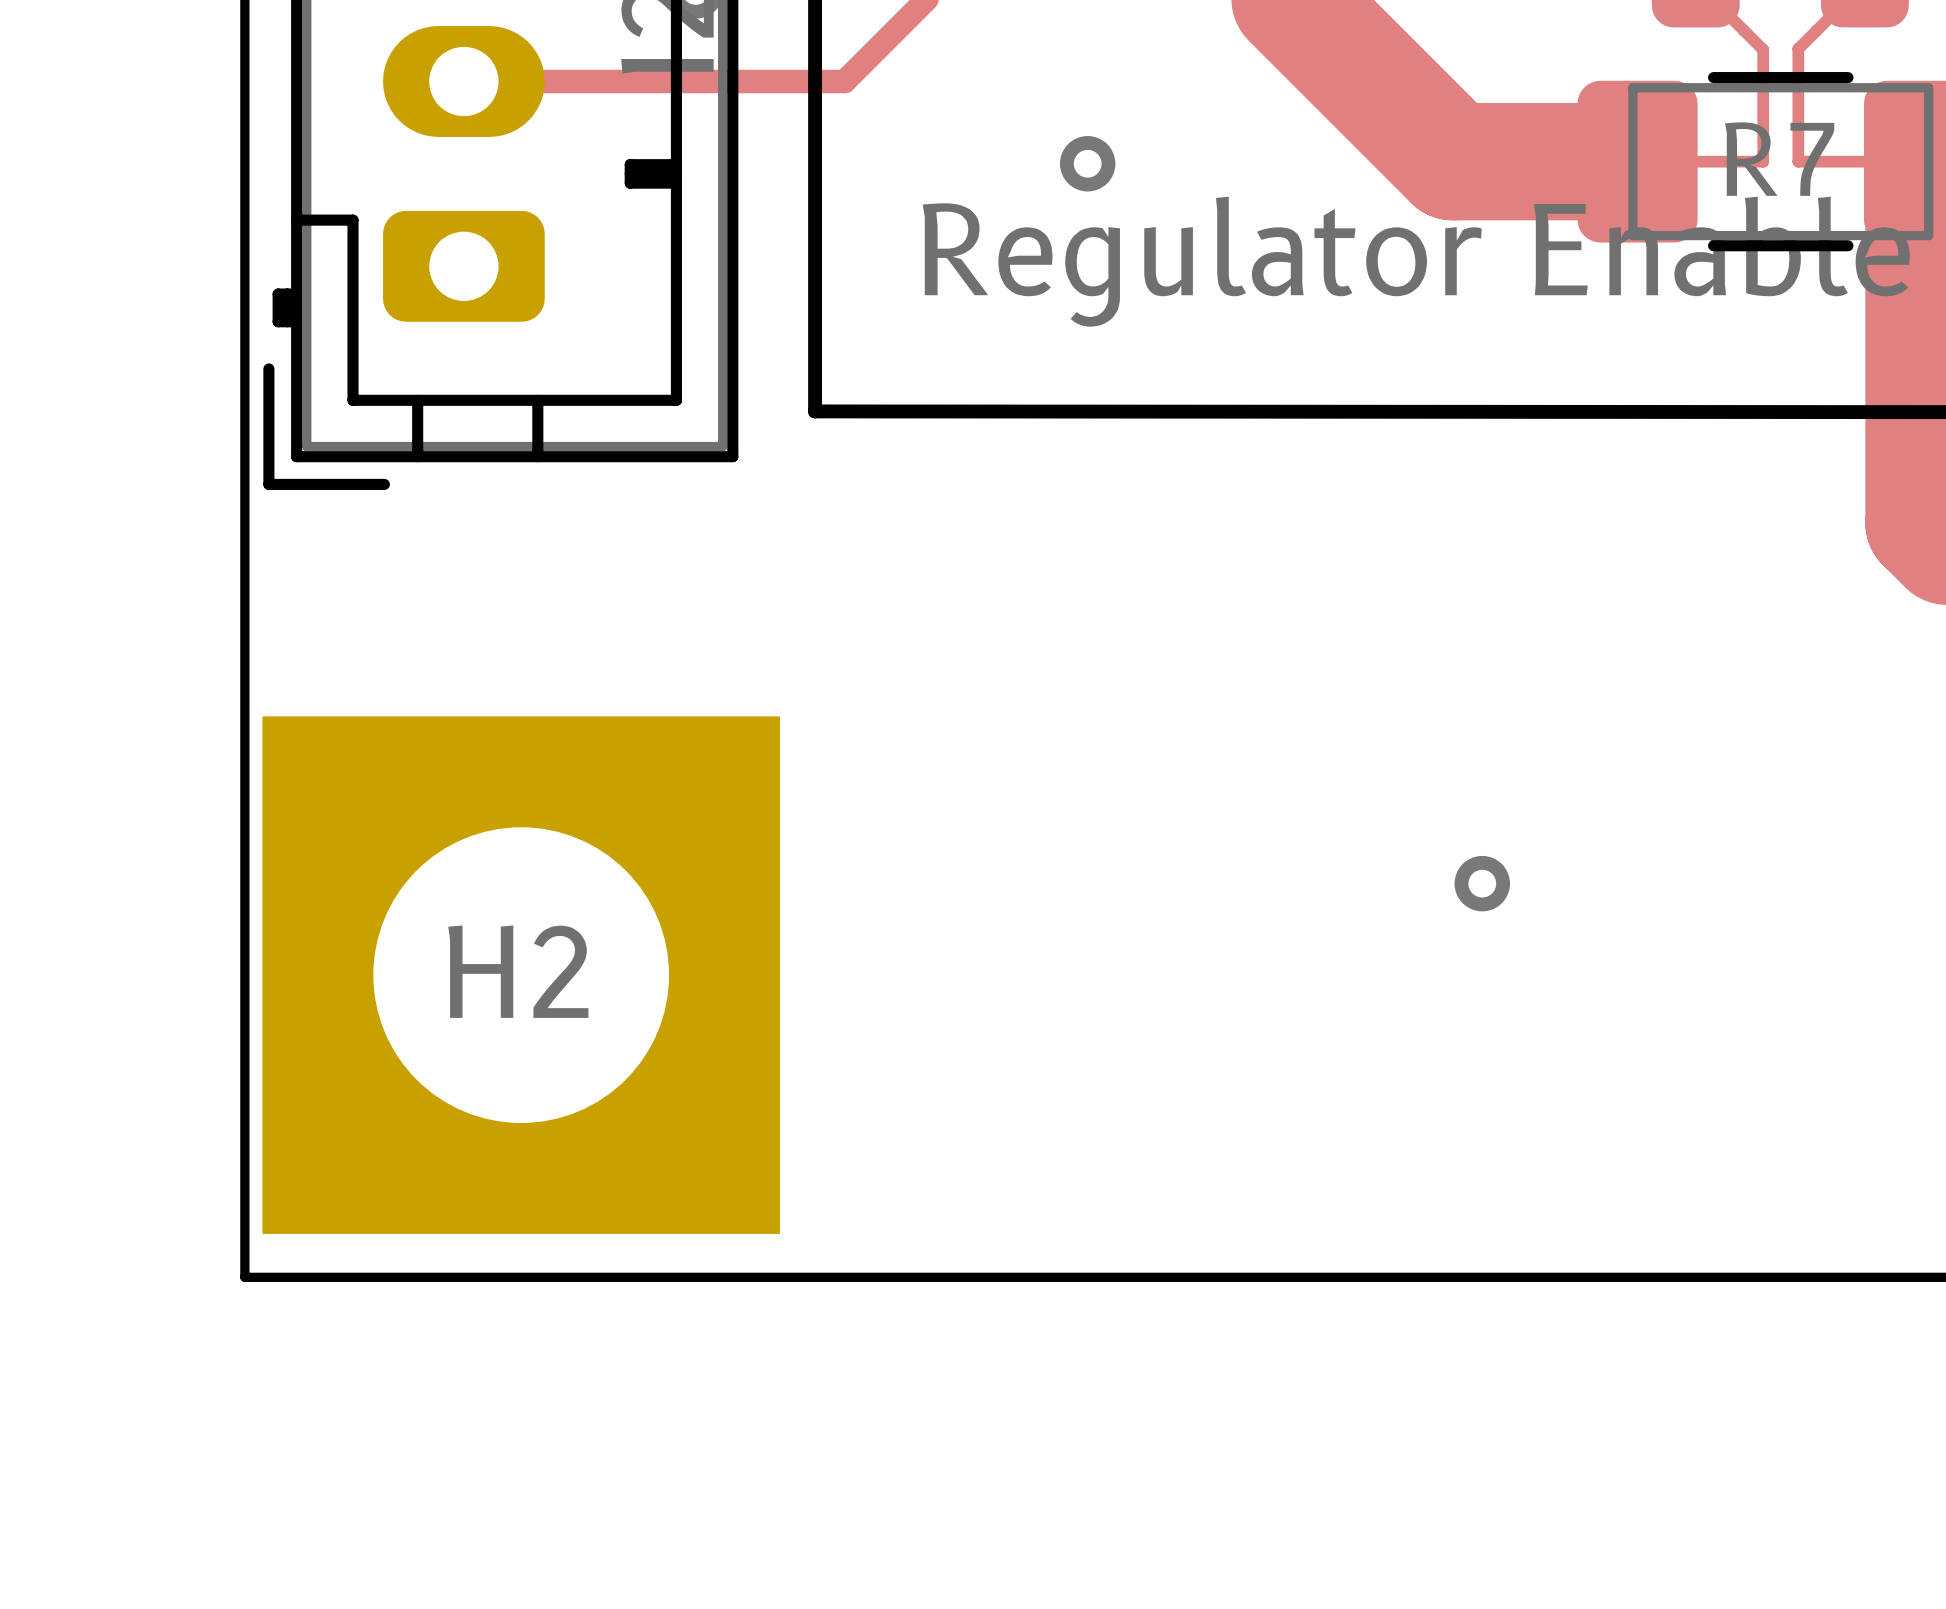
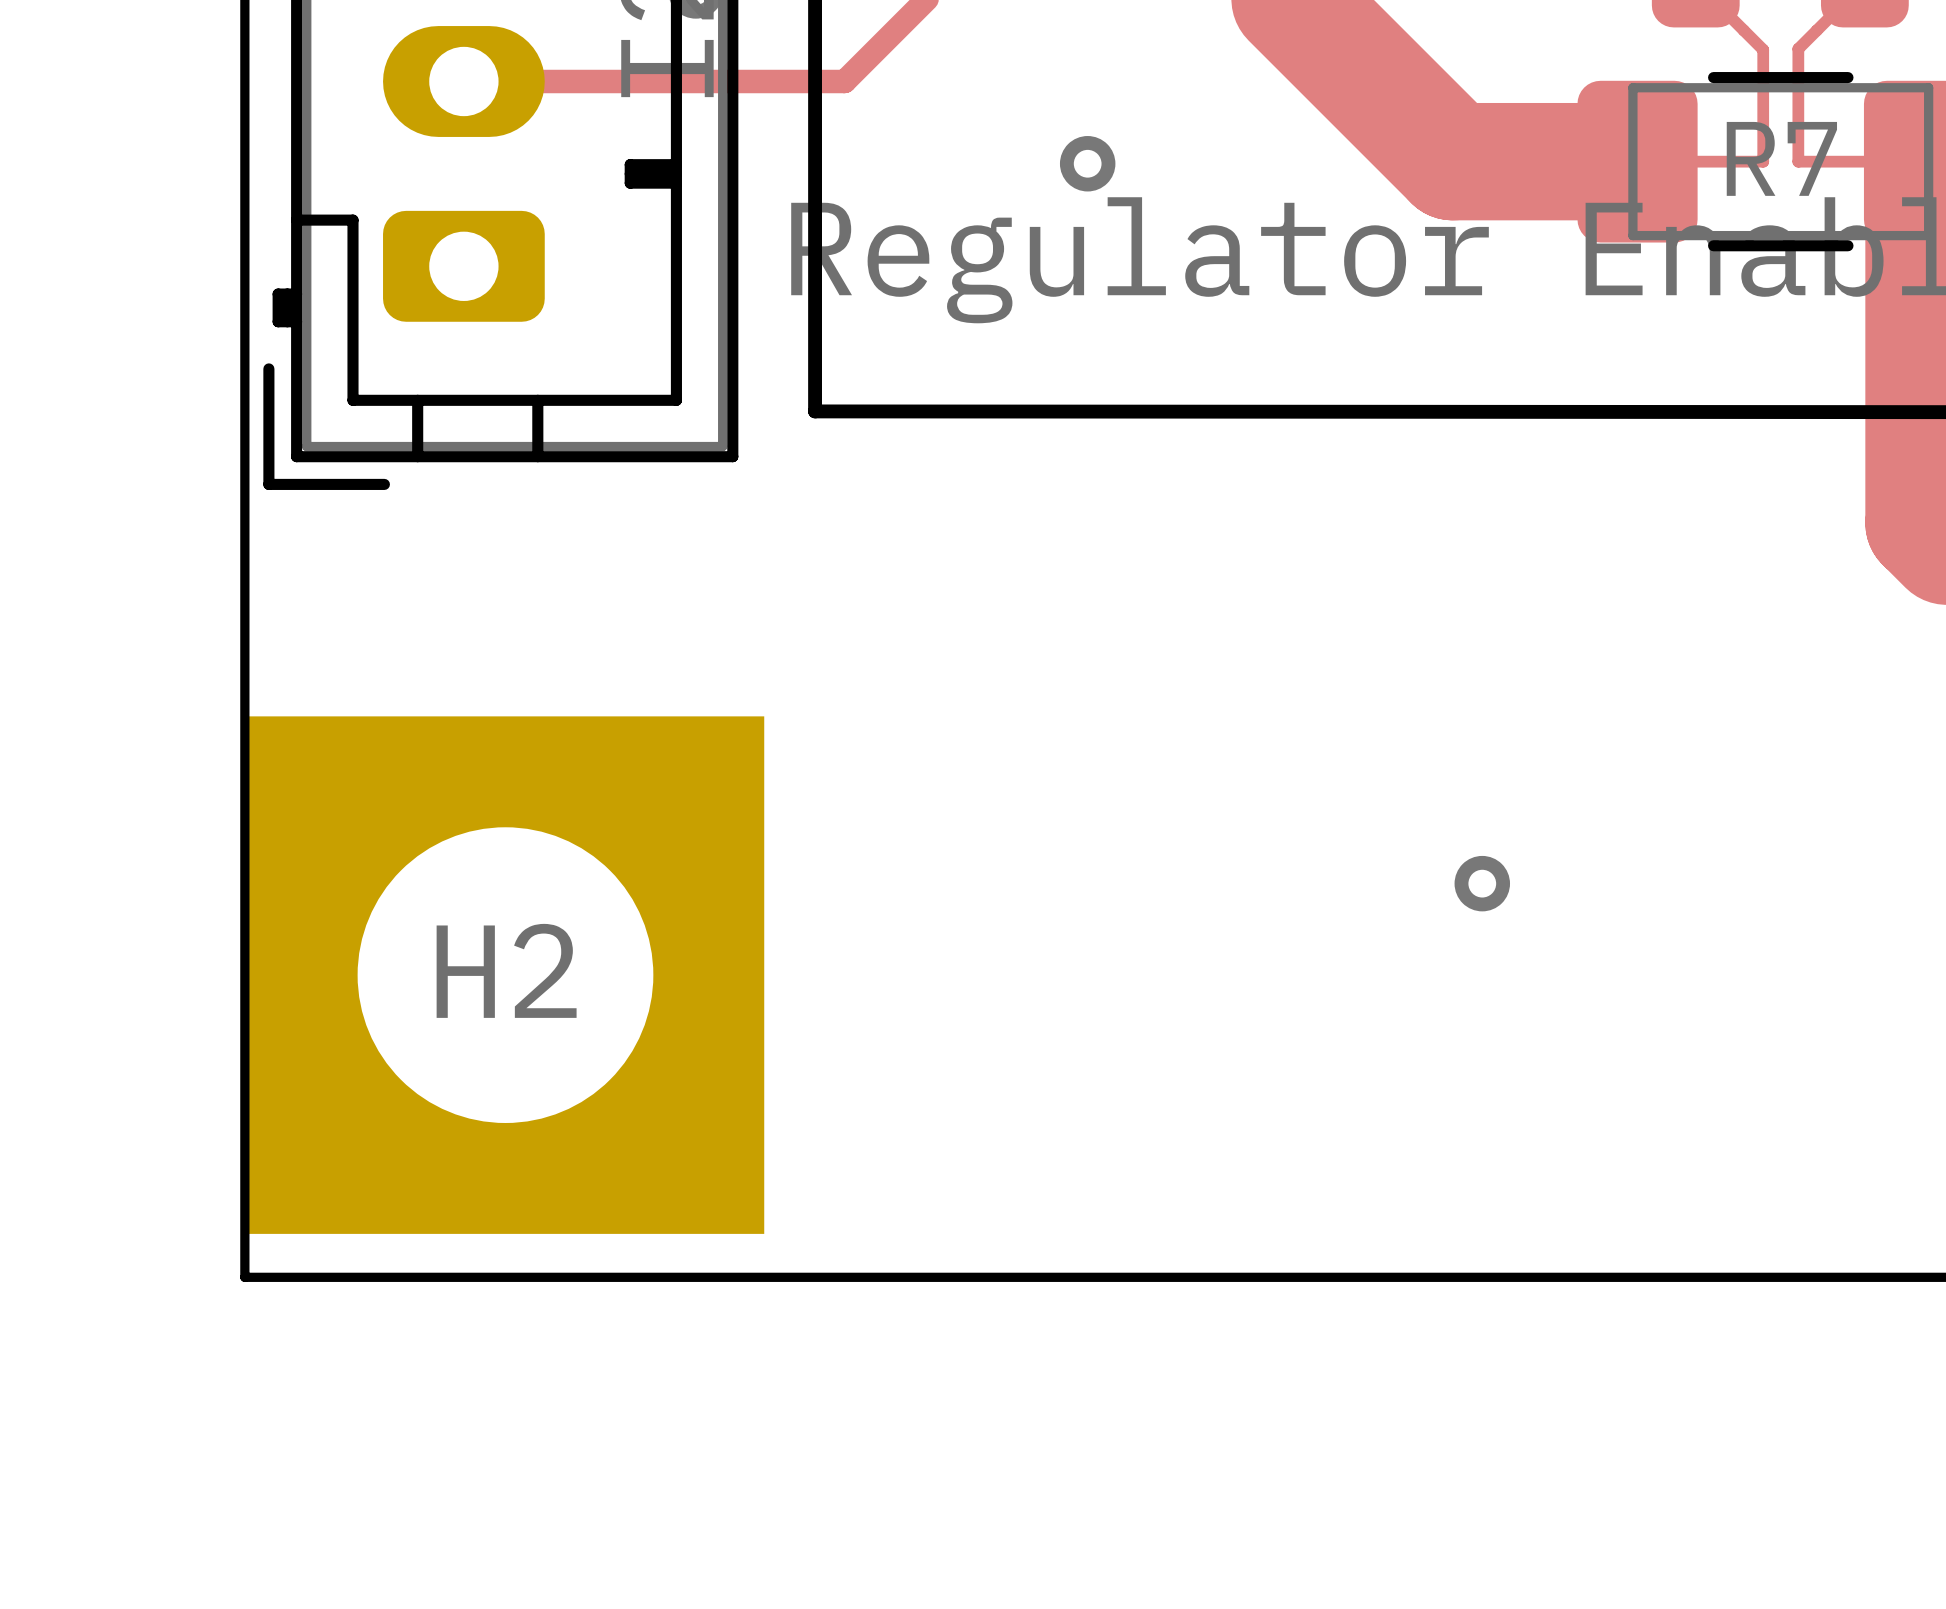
H2 position: (521, 975) -> (505, 975)

